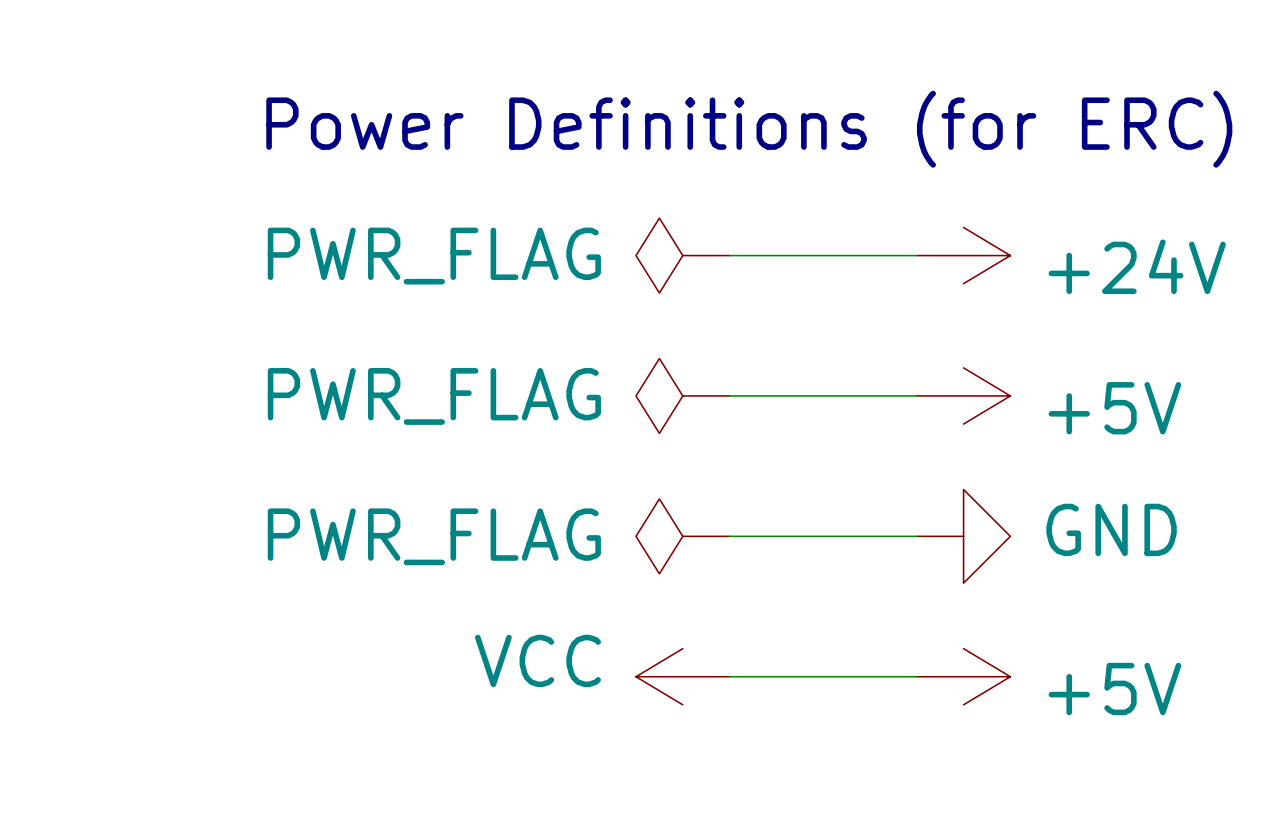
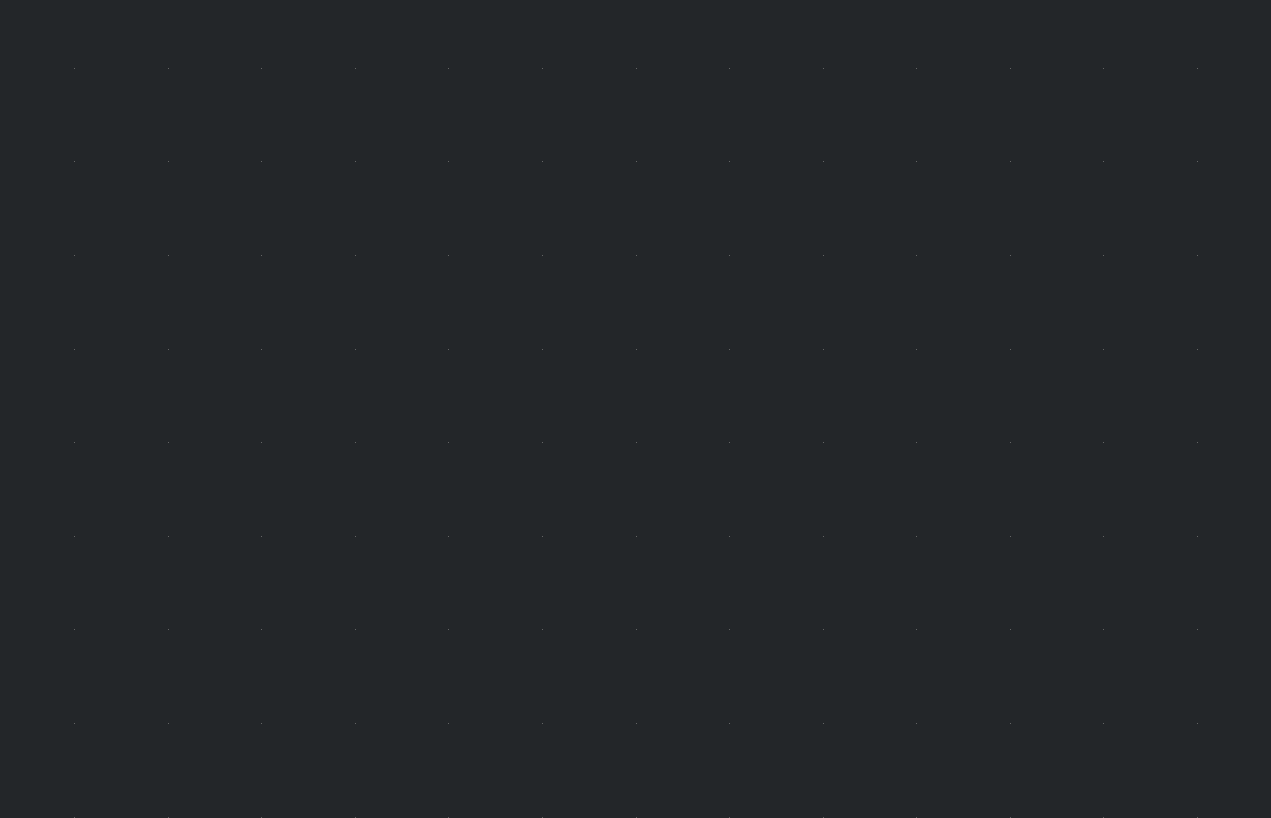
text: Power Definitions (for ERC) (749, 129) -> none
power symbol: PWR_FLAG (682, 255) -> none
wire: (729, 255) (916, 255) -> none
power symbol: +24V (963, 255) -> none
power symbol: PWR_FLAG (682, 395) -> none
wire: (729, 395) (916, 395) -> none
power symbol: +5V (963, 395) -> none
power symbol: PWR_FLAG (682, 536) -> none
wire: (729, 536) (916, 536) -> none
power symbol: GND (963, 536) -> none
power symbol: VCC (682, 676) -> none
wire: (729, 676) (916, 676) -> none
power symbol: +5V (963, 676) -> none

